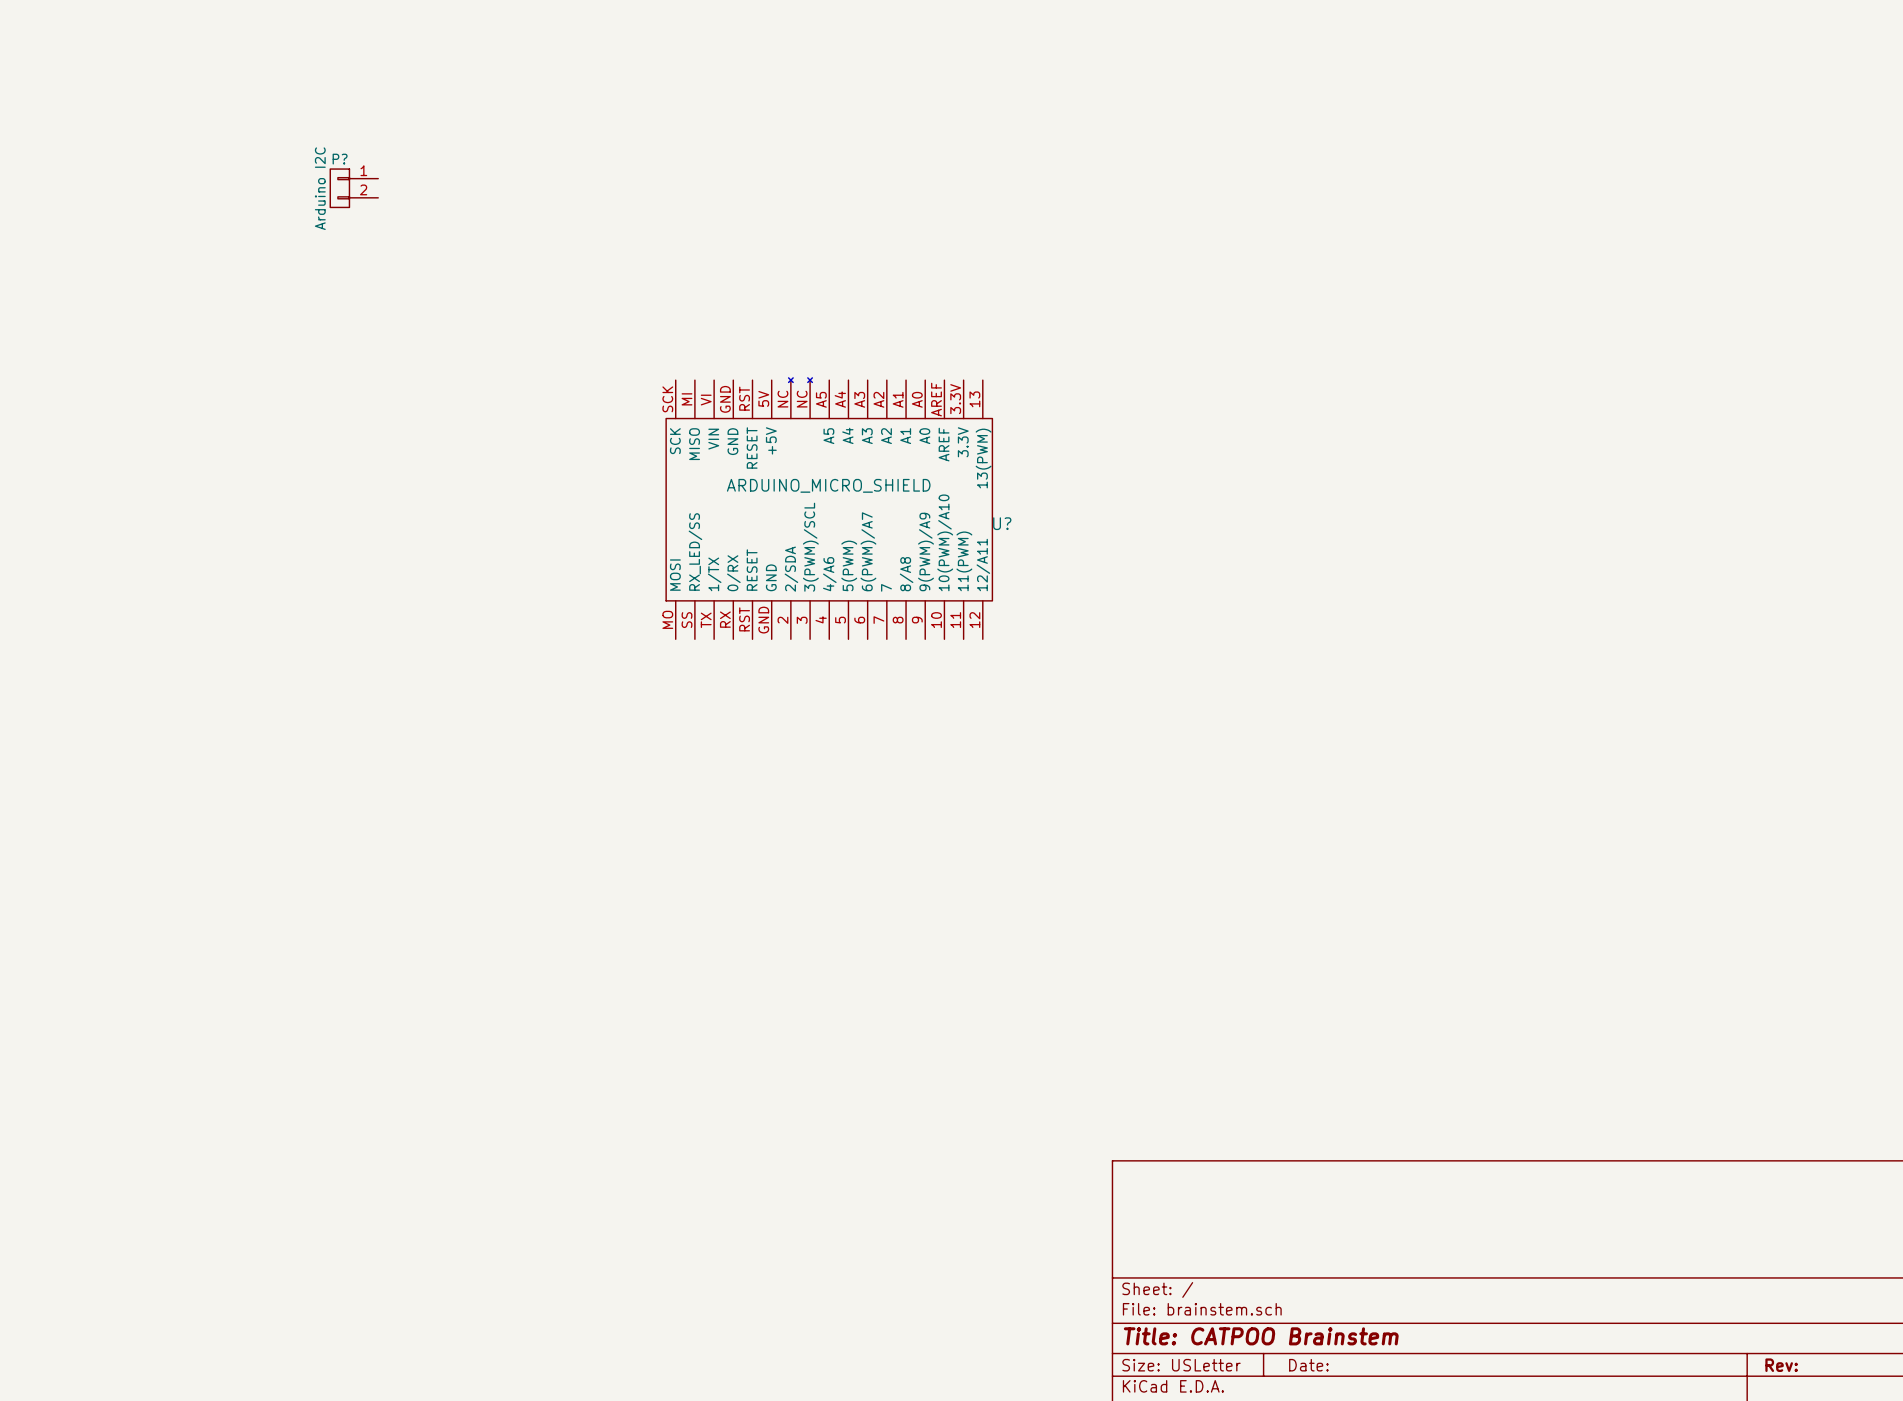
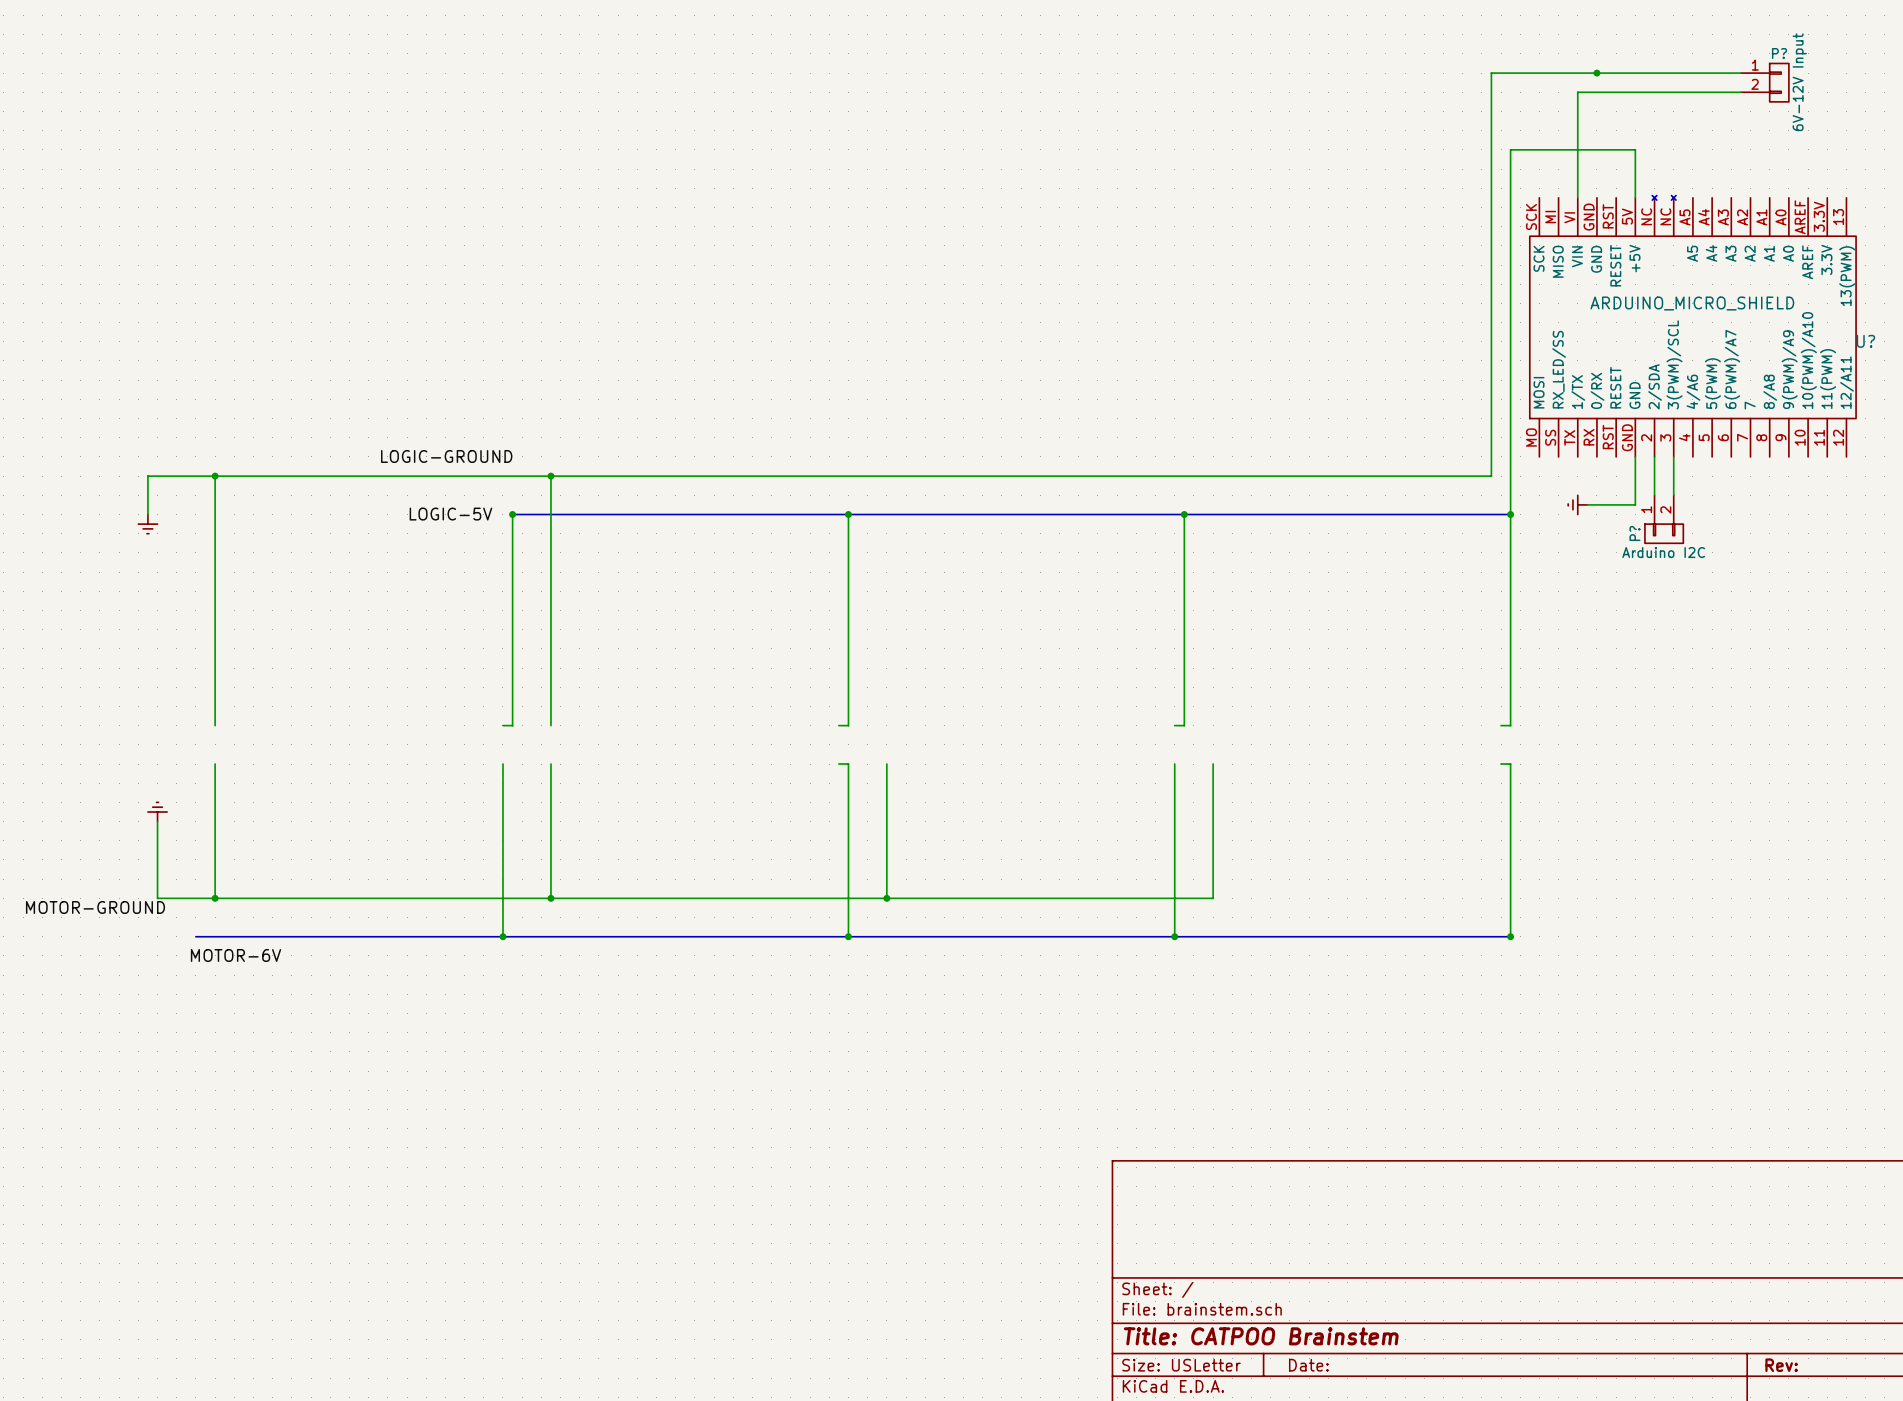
junction: none -> (1596, 73)
wire: none -> (1740, 73) (1491, 73) (1491, 476) (147, 476) (147, 514)
P?: none -> 6V-12V Input (1764, 82)
wire: none -> (1740, 92) (1577, 92) (1577, 197)
P?: Arduino I2C (354, 188) -> none
wire: none -> (1635, 197) (1635, 149) (1510, 149) (1510, 725) (1501, 725)
U?: none -> ARDUINO_MICRO_SHIELD (1692, 326)
label: none -> LOGIC-GROUND (446, 456)
wire: none -> (1635, 456) (1635, 504) (1587, 504)
wire: none -> (1654, 456) (1654, 495)
wire: none -> (1673, 456) (1673, 495)
wire: none -> (215, 476) (215, 725)
junction: none -> (215, 476)
wire: none -> (550, 476) (550, 725)
junction: none -> (550, 476)
power symbol: none -> (1577, 504)
U?: ARDUINO_MICRO_SHIELD (829, 508) -> none
label: none -> LOGIC-5V (450, 514)
wire: none -> (512, 514) (512, 725) (502, 725)
bus: none -> (512, 514) (1510, 514)
junction: none -> (512, 514)
wire: none -> (848, 514) (848, 725) (838, 725)
junction: none -> (848, 514)
wire: none -> (1184, 514) (1184, 725) (1174, 725)
junction: none -> (1184, 514)
junction: none -> (1510, 514)
P?: none -> Arduino I2C (1664, 519)
power symbol: none -> (147, 524)
wire: none -> (215, 764) (215, 898)
wire: none -> (502, 764) (502, 936)
wire: none -> (550, 764) (550, 898)
wire: none -> (838, 764) (848, 764) (848, 936)
wire: none -> (886, 764) (886, 898)
wire: none -> (1174, 764) (1174, 936)
wire: none -> (1213, 764) (1213, 898) (157, 898) (157, 821)
wire: none -> (1501, 764) (1510, 764) (1510, 936)
power symbol: none -> (157, 811)
junction: none -> (215, 898)
junction: none -> (550, 898)
junction: none -> (886, 898)
label: none -> MOTOR-GROUND (95, 907)
bus: none -> (195, 936) (1510, 936)
junction: none -> (502, 936)
junction: none -> (848, 936)
junction: none -> (1174, 936)
junction: none -> (1510, 936)
label: none -> MOTOR-6V (236, 955)

